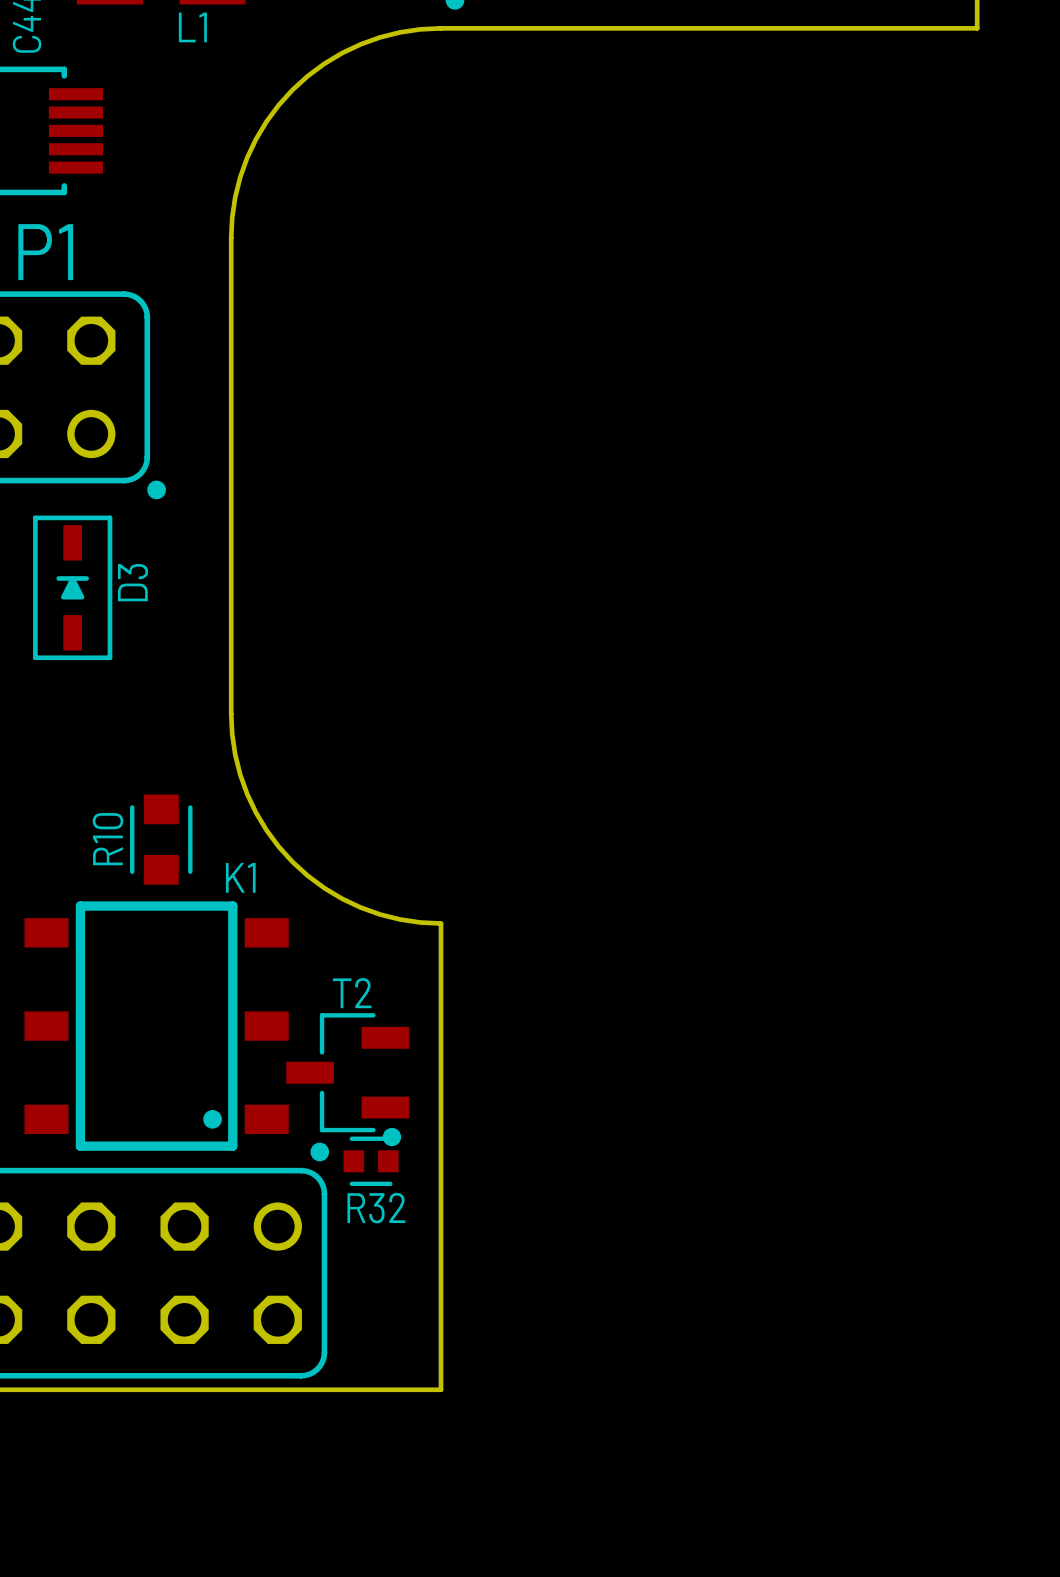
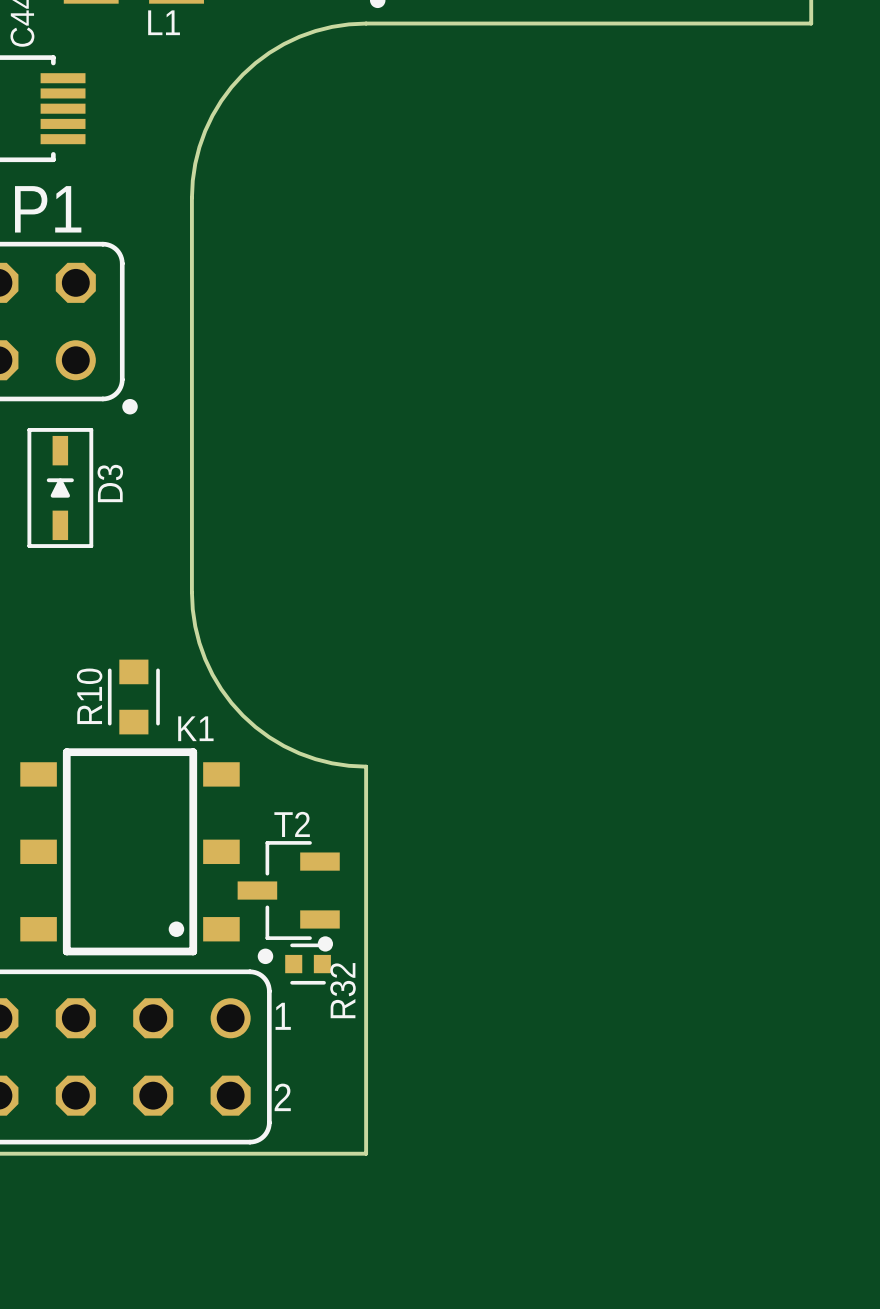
R32 name rotation: 0° (376, 1208) -> 90° counterclockwise (343, 990)
text: none -> 1 (283, 1016)
text: none -> 2 (282, 1097)

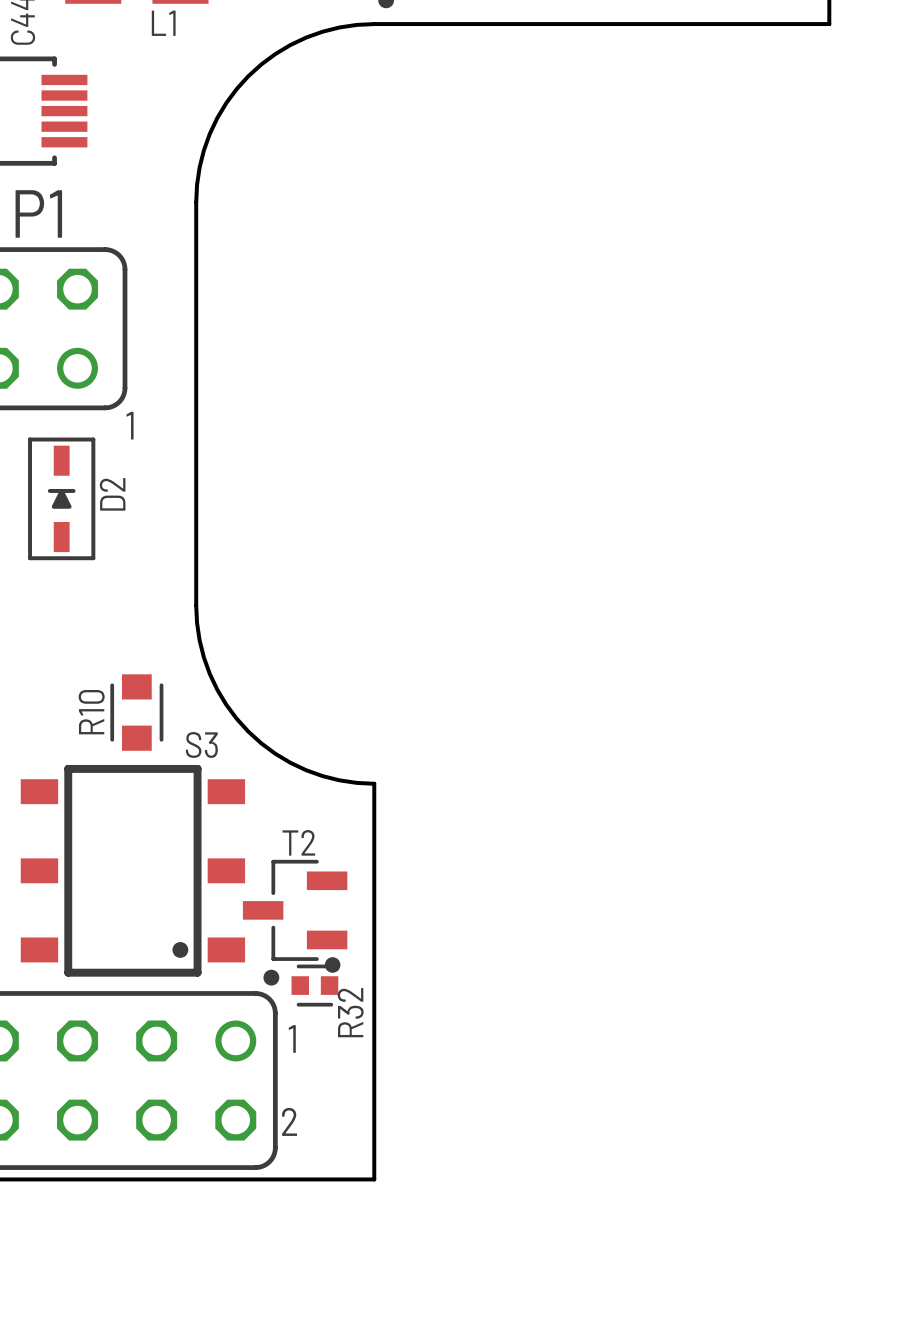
drawing: [122, 398, 138, 415] -> none
text: none -> 1 (130, 425)
D3 name: D3 (110, 483) -> D2 (112, 494)
K1 name: K1 (195, 728) -> S3 (201, 744)

